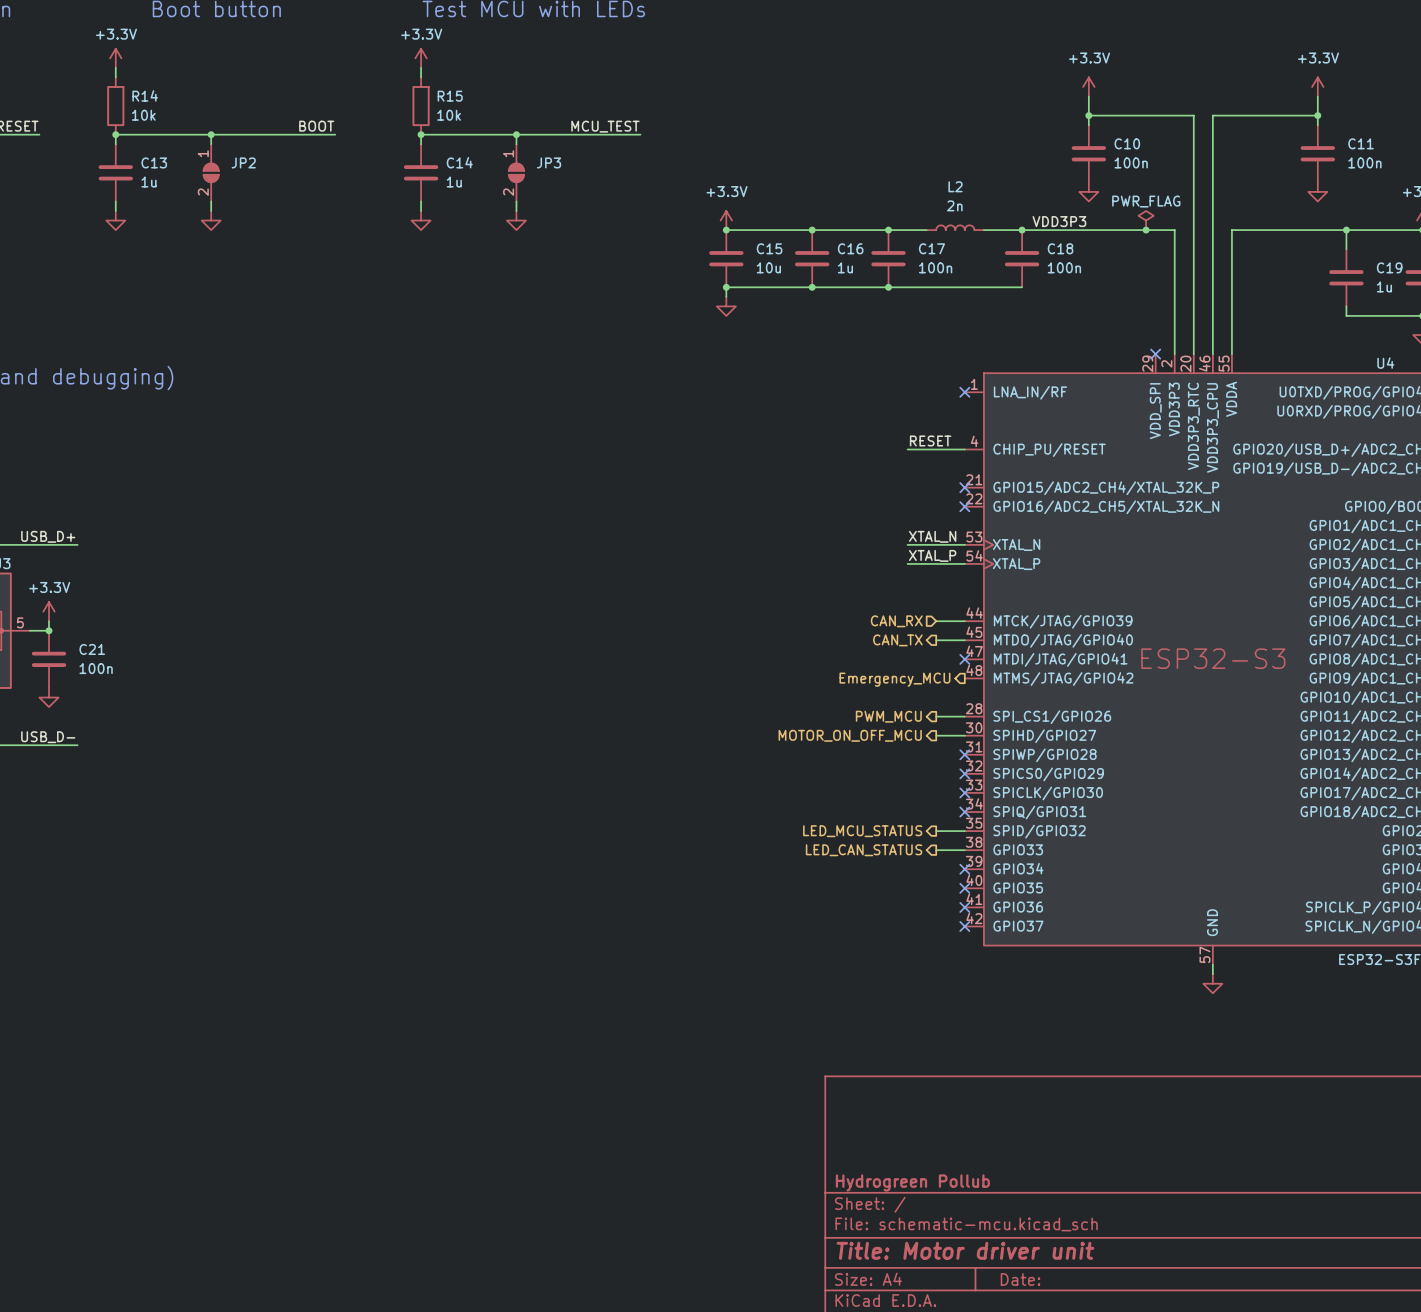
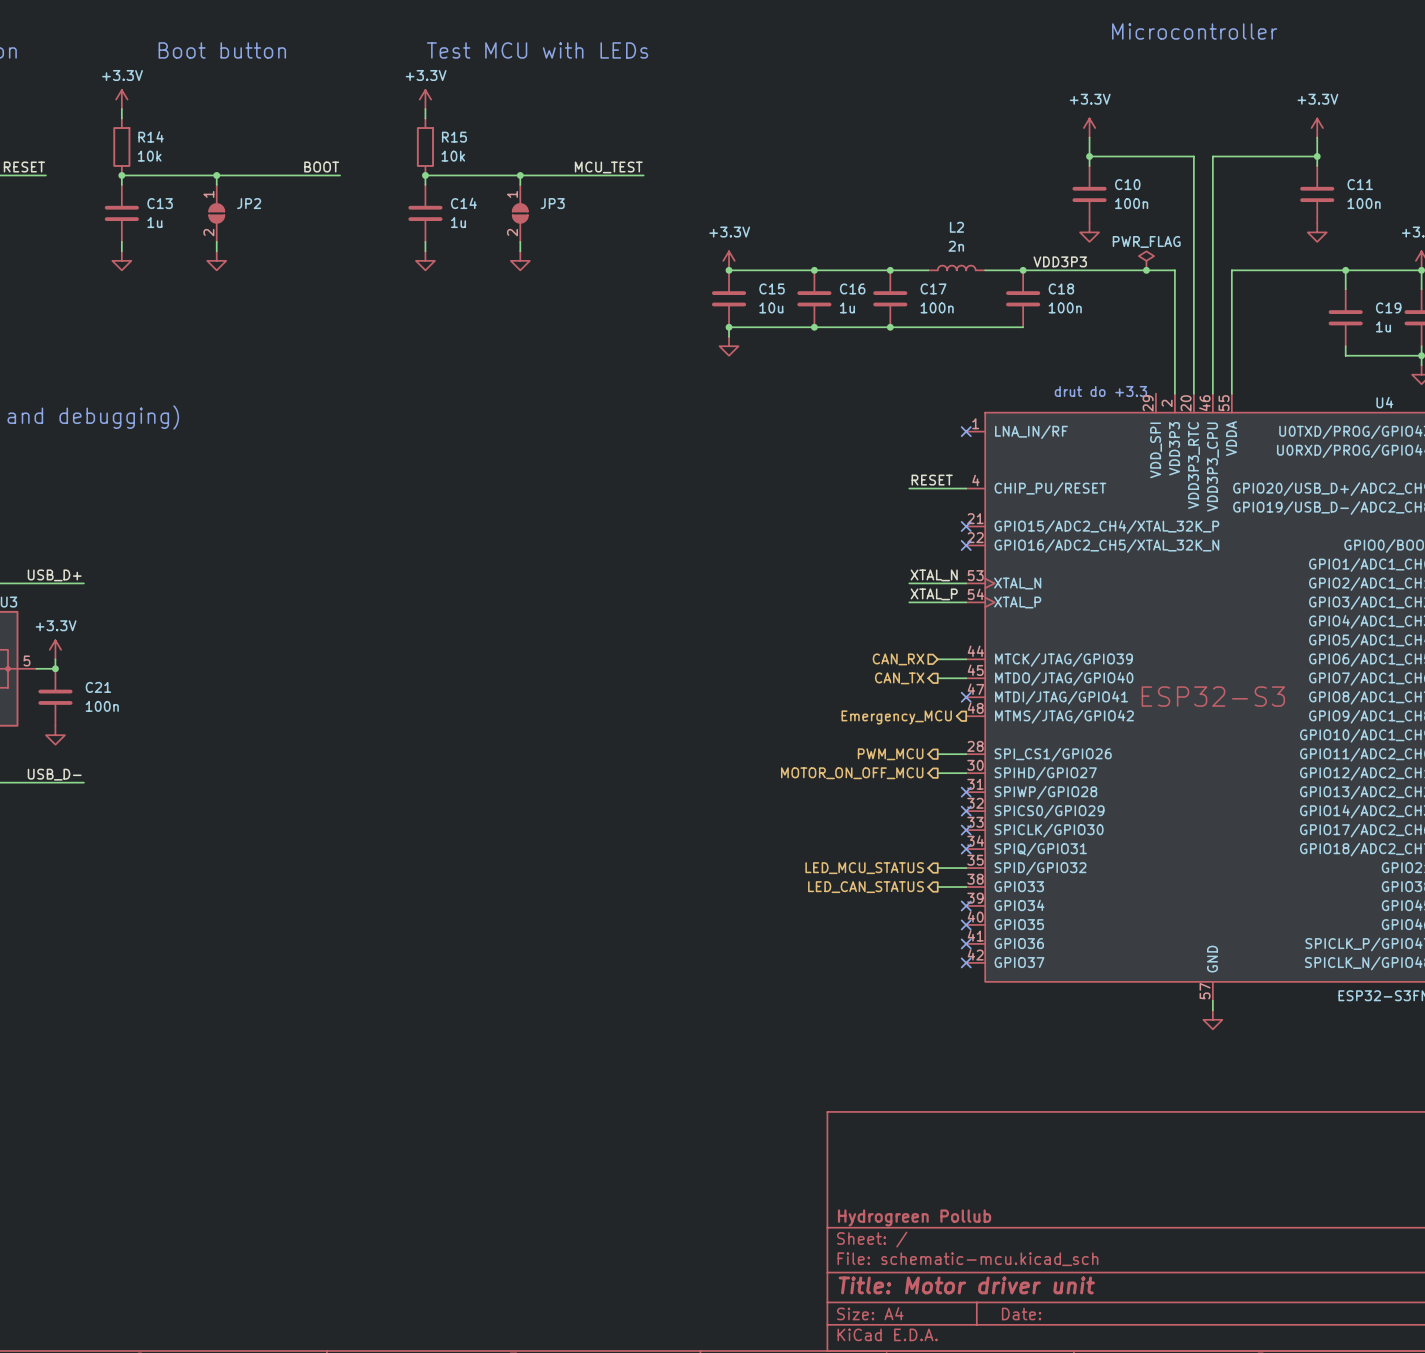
text: none -> drut do +3.3 (1100, 391)
no-connect mark: (1155, 354) -> none

